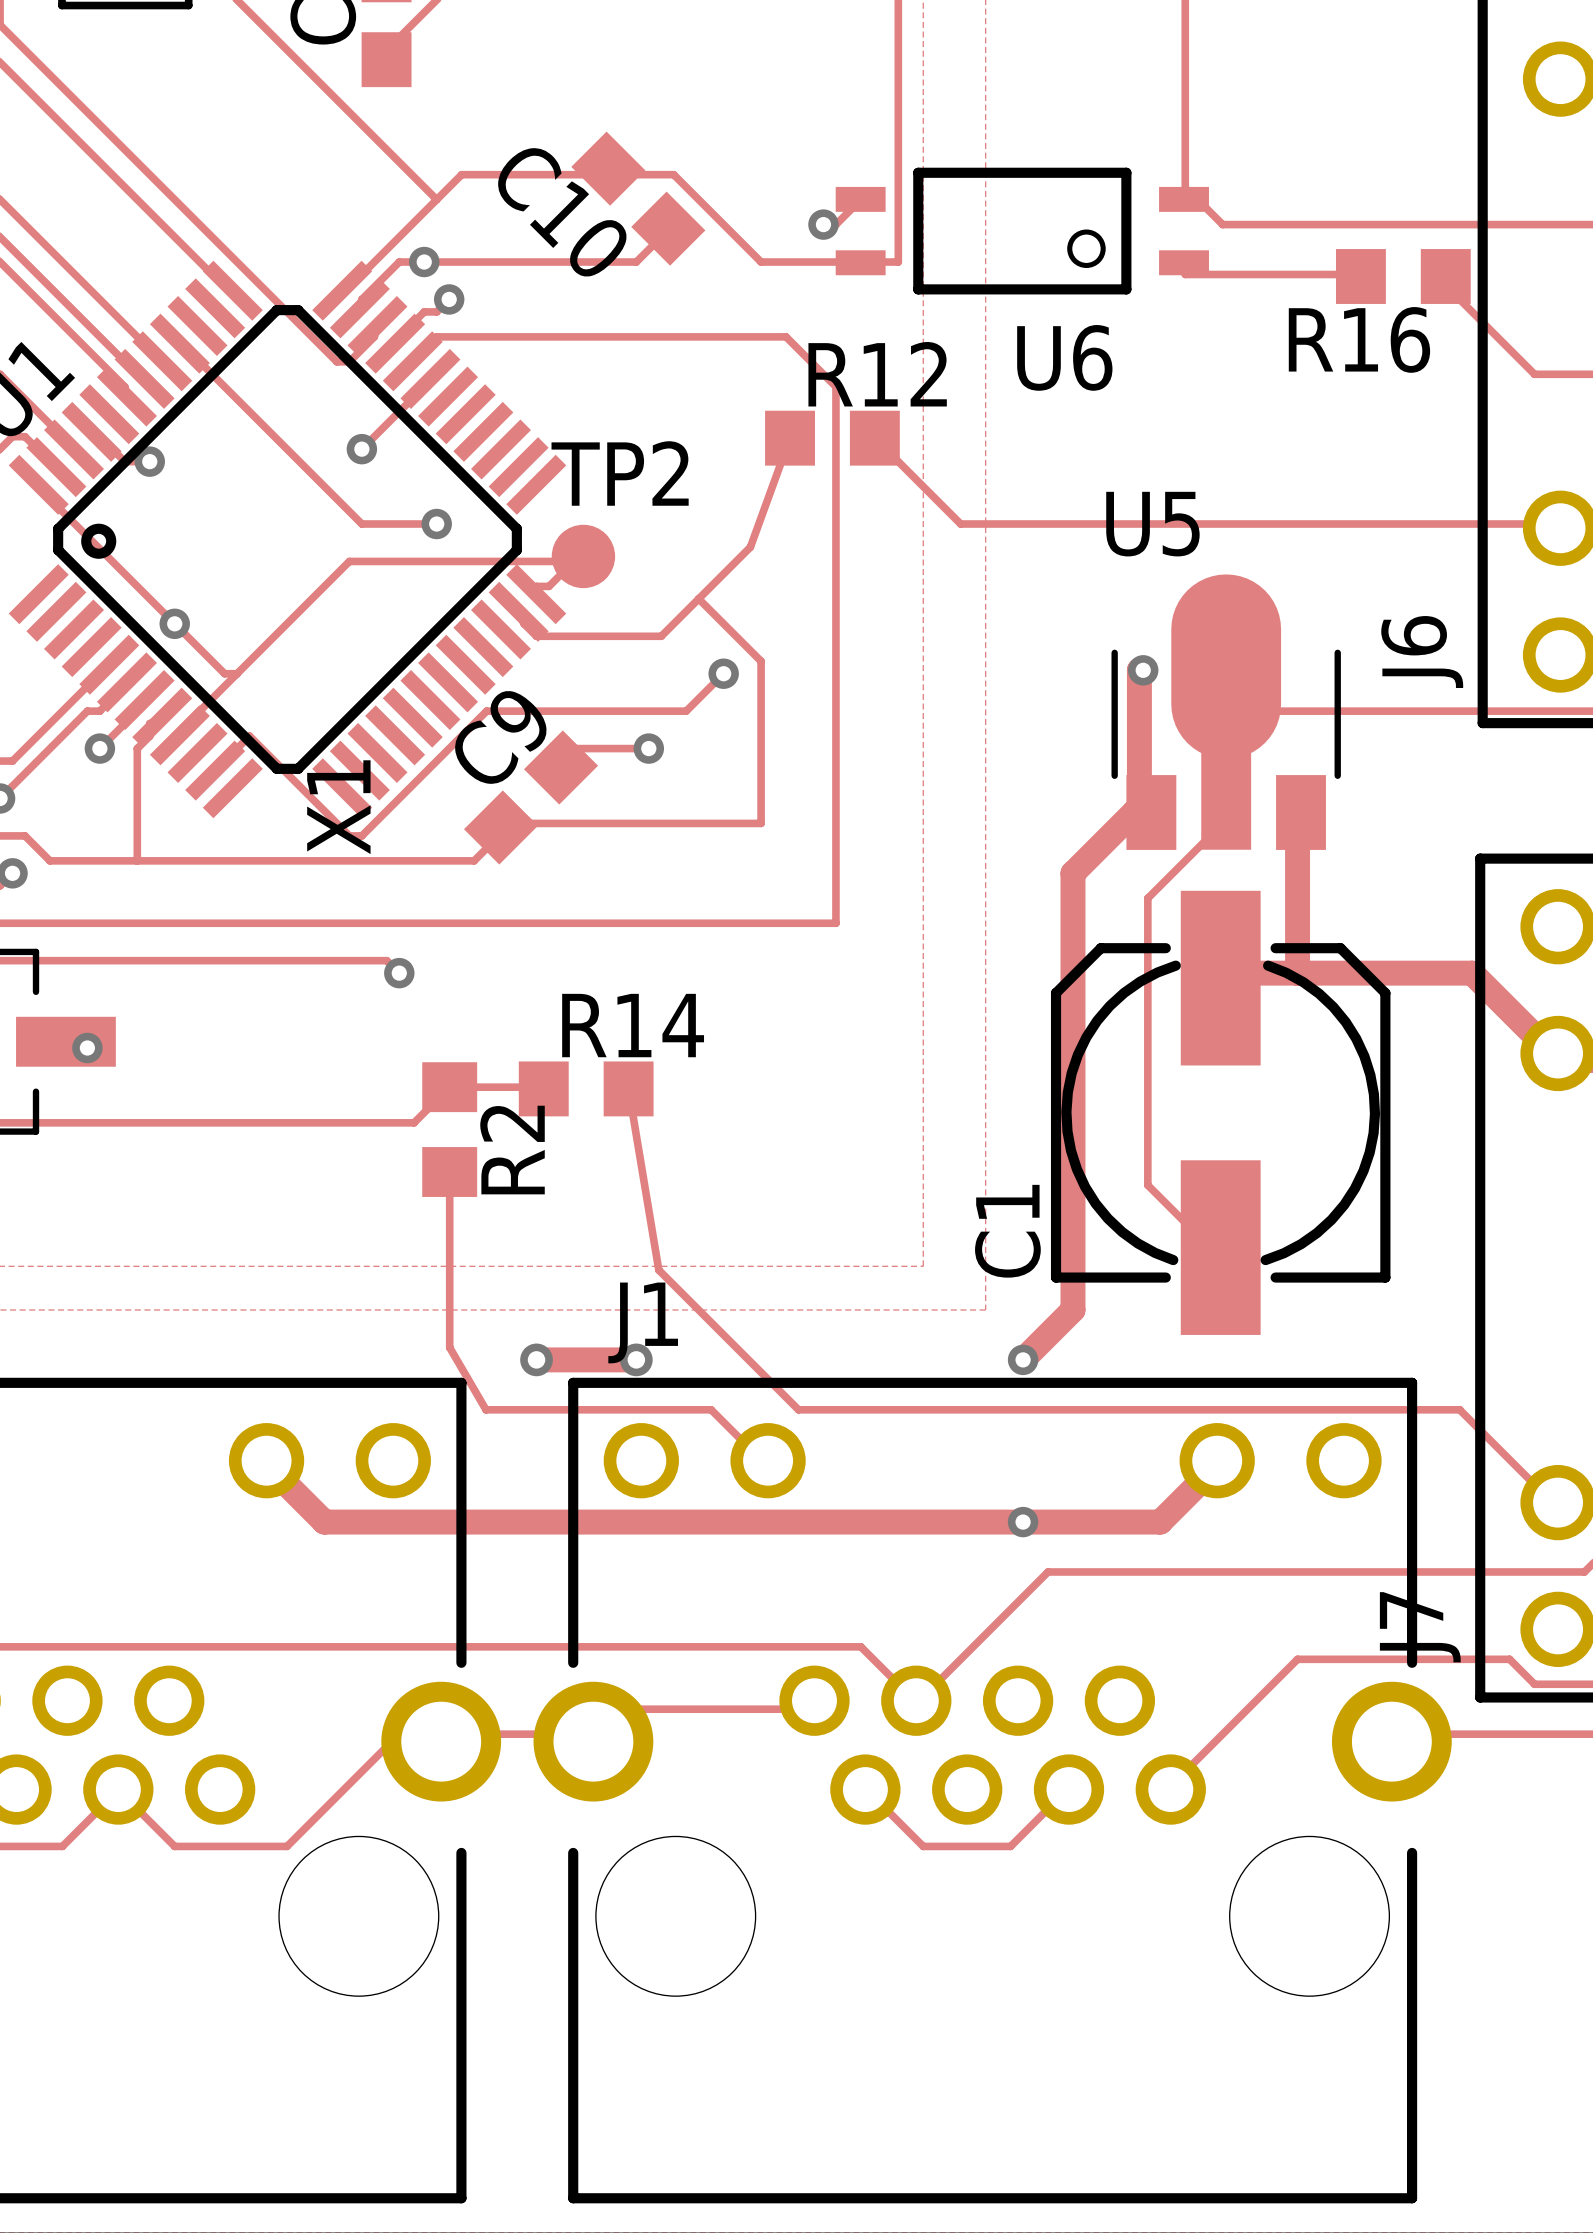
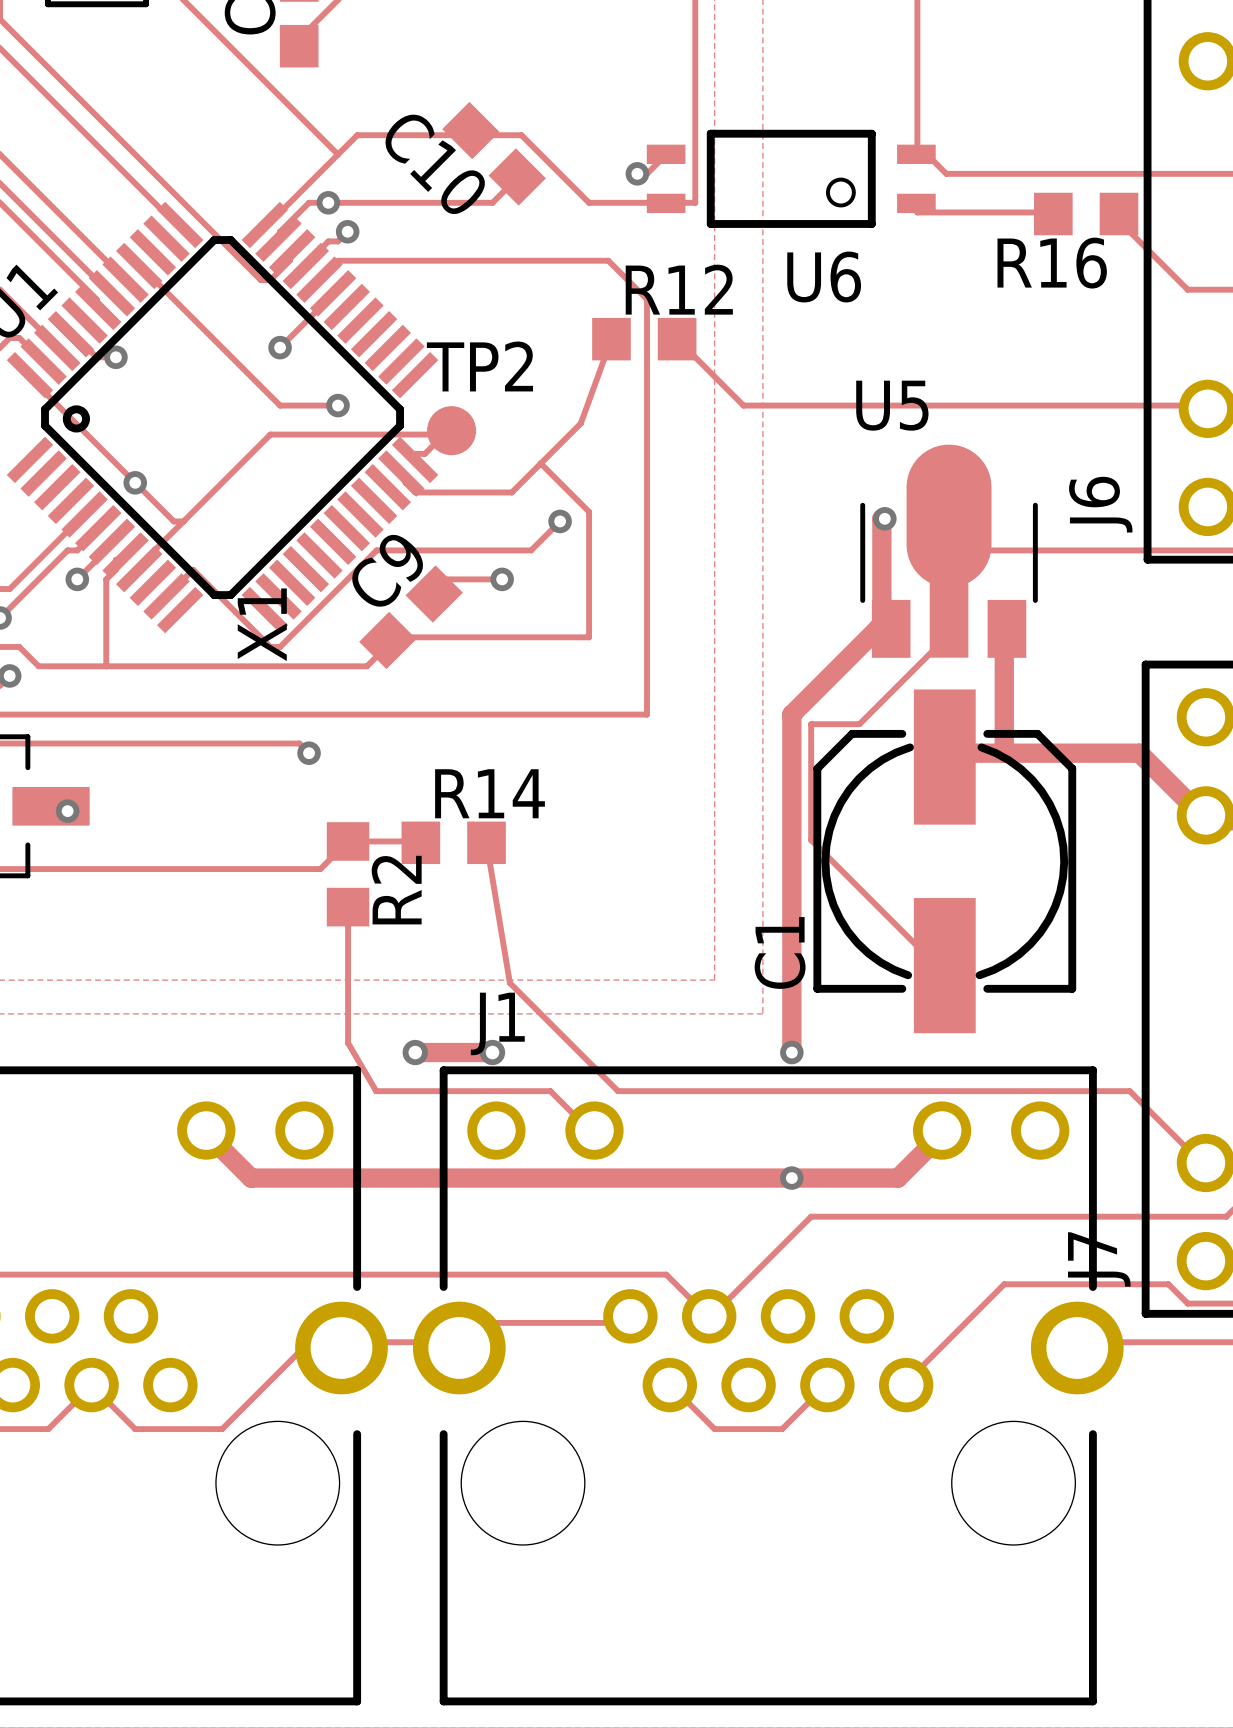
track: (1072, 873) (1072, 1309) (1023, 1359) -> (830, 675) (791, 714) (791, 1052)
track: (1147, 898) (1147, 1185) -> (888, 695) (859, 724) (811, 724) (811, 840) (888, 917)

